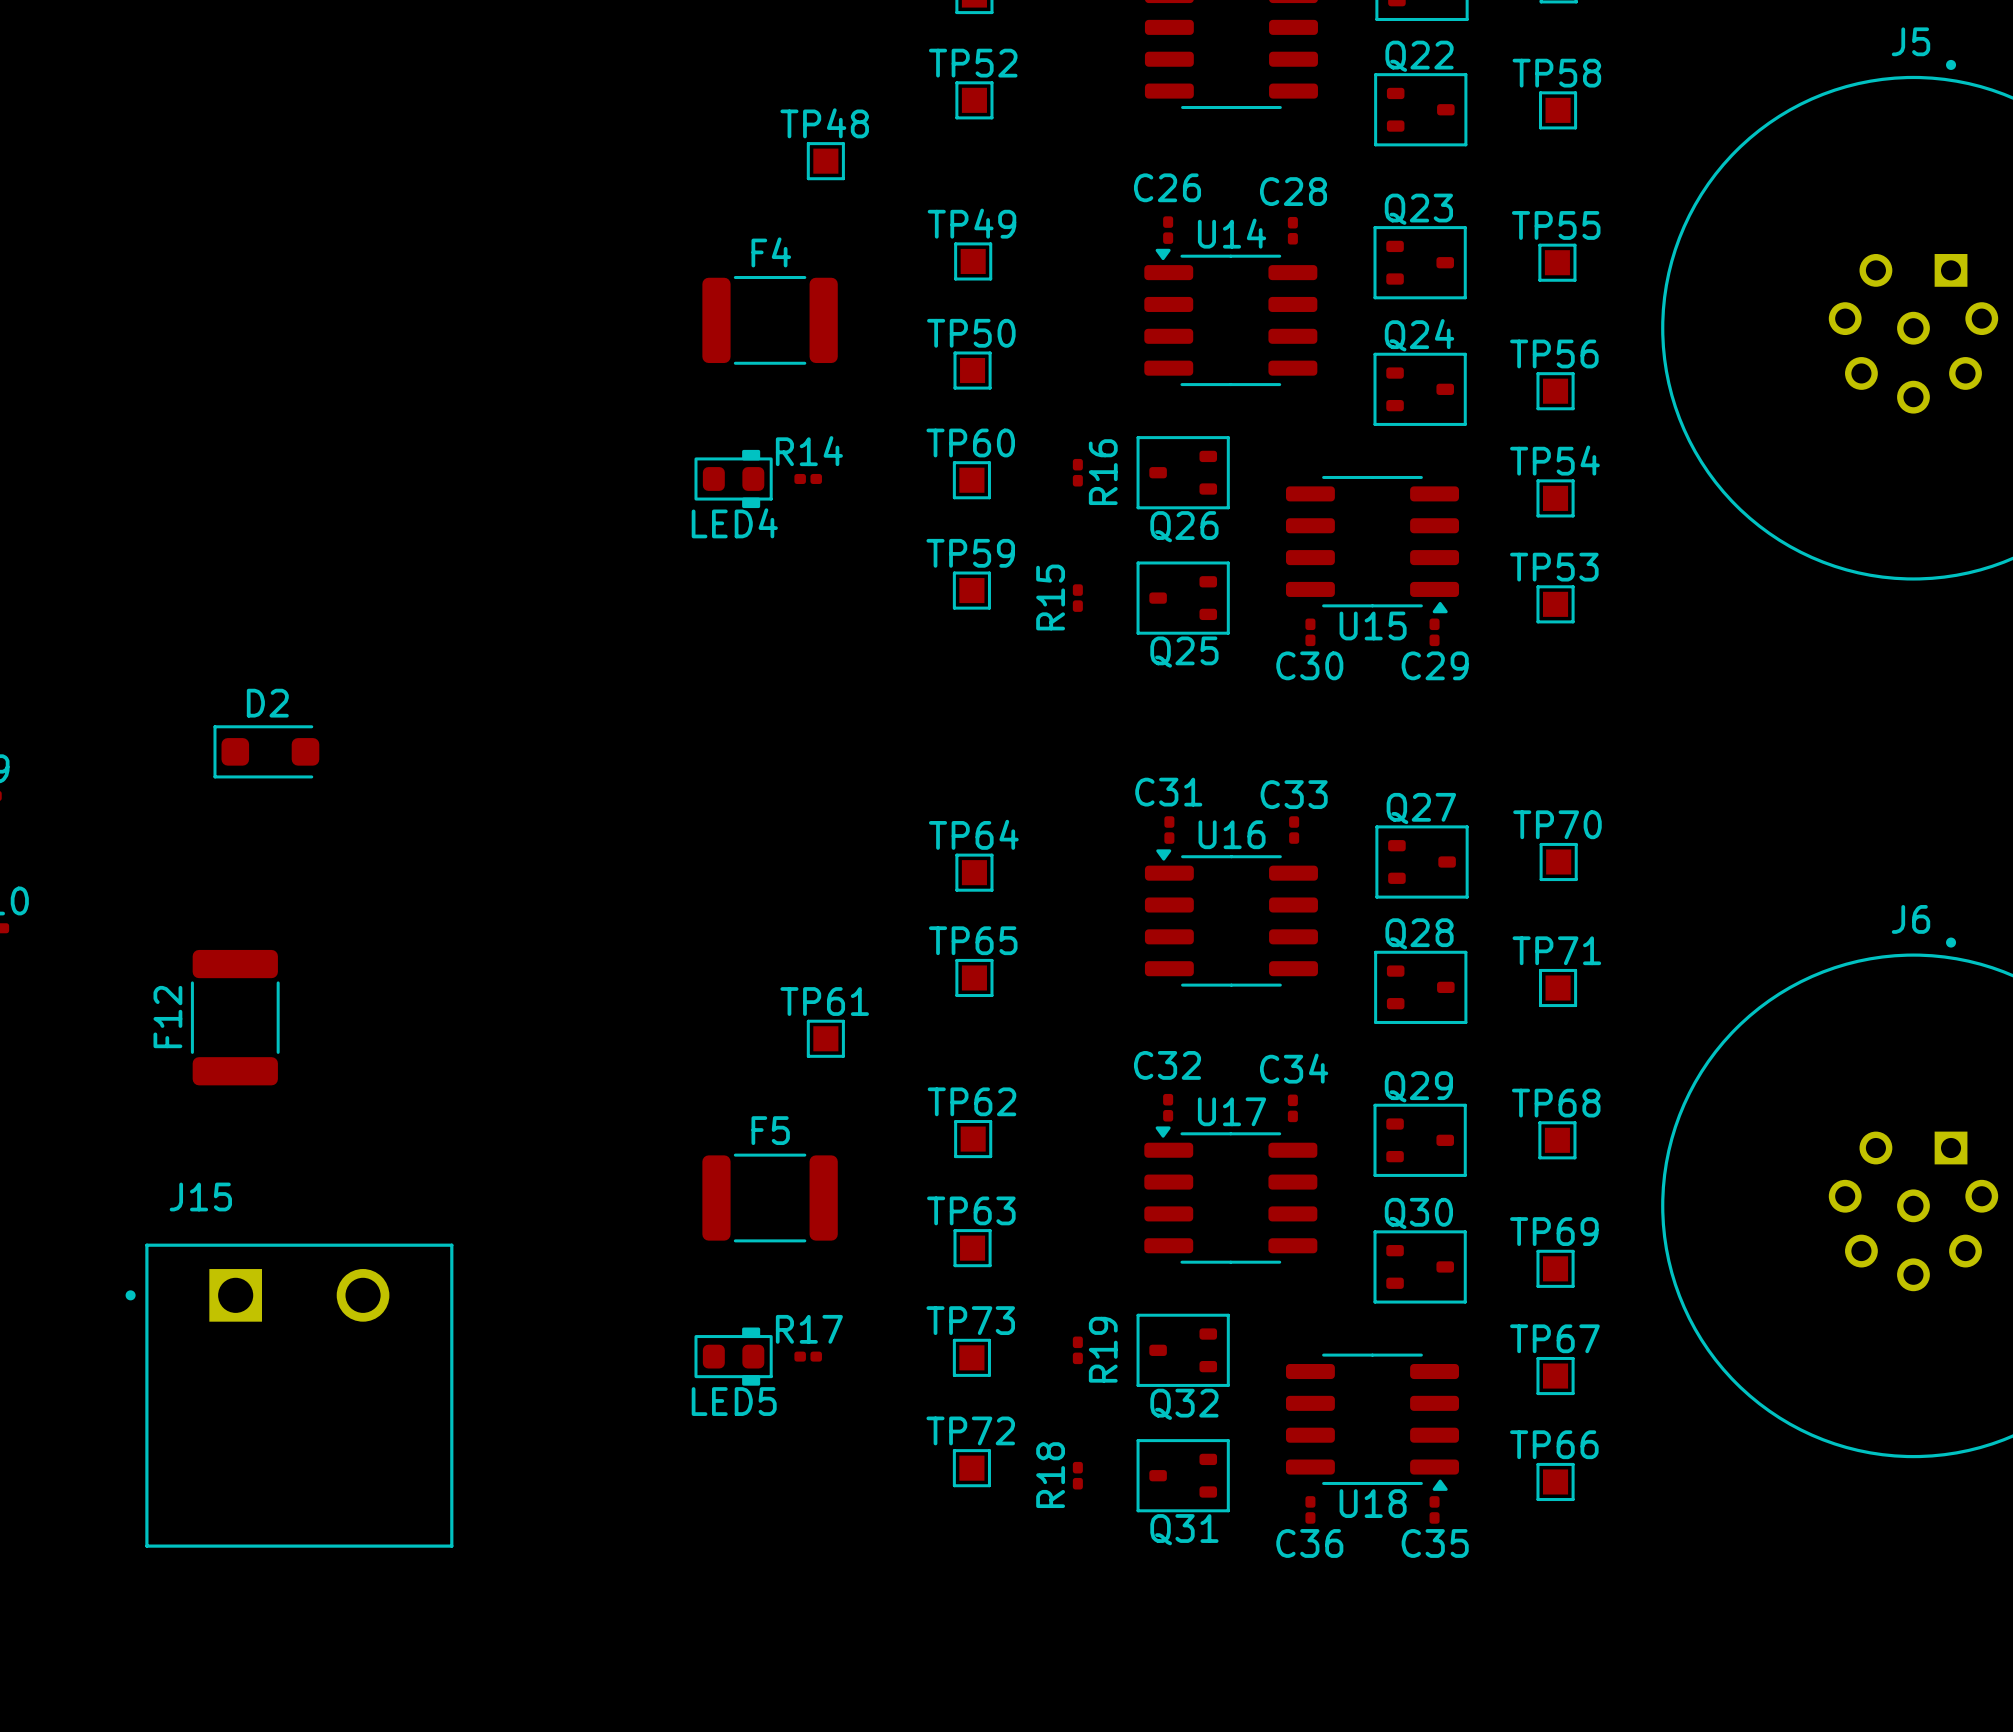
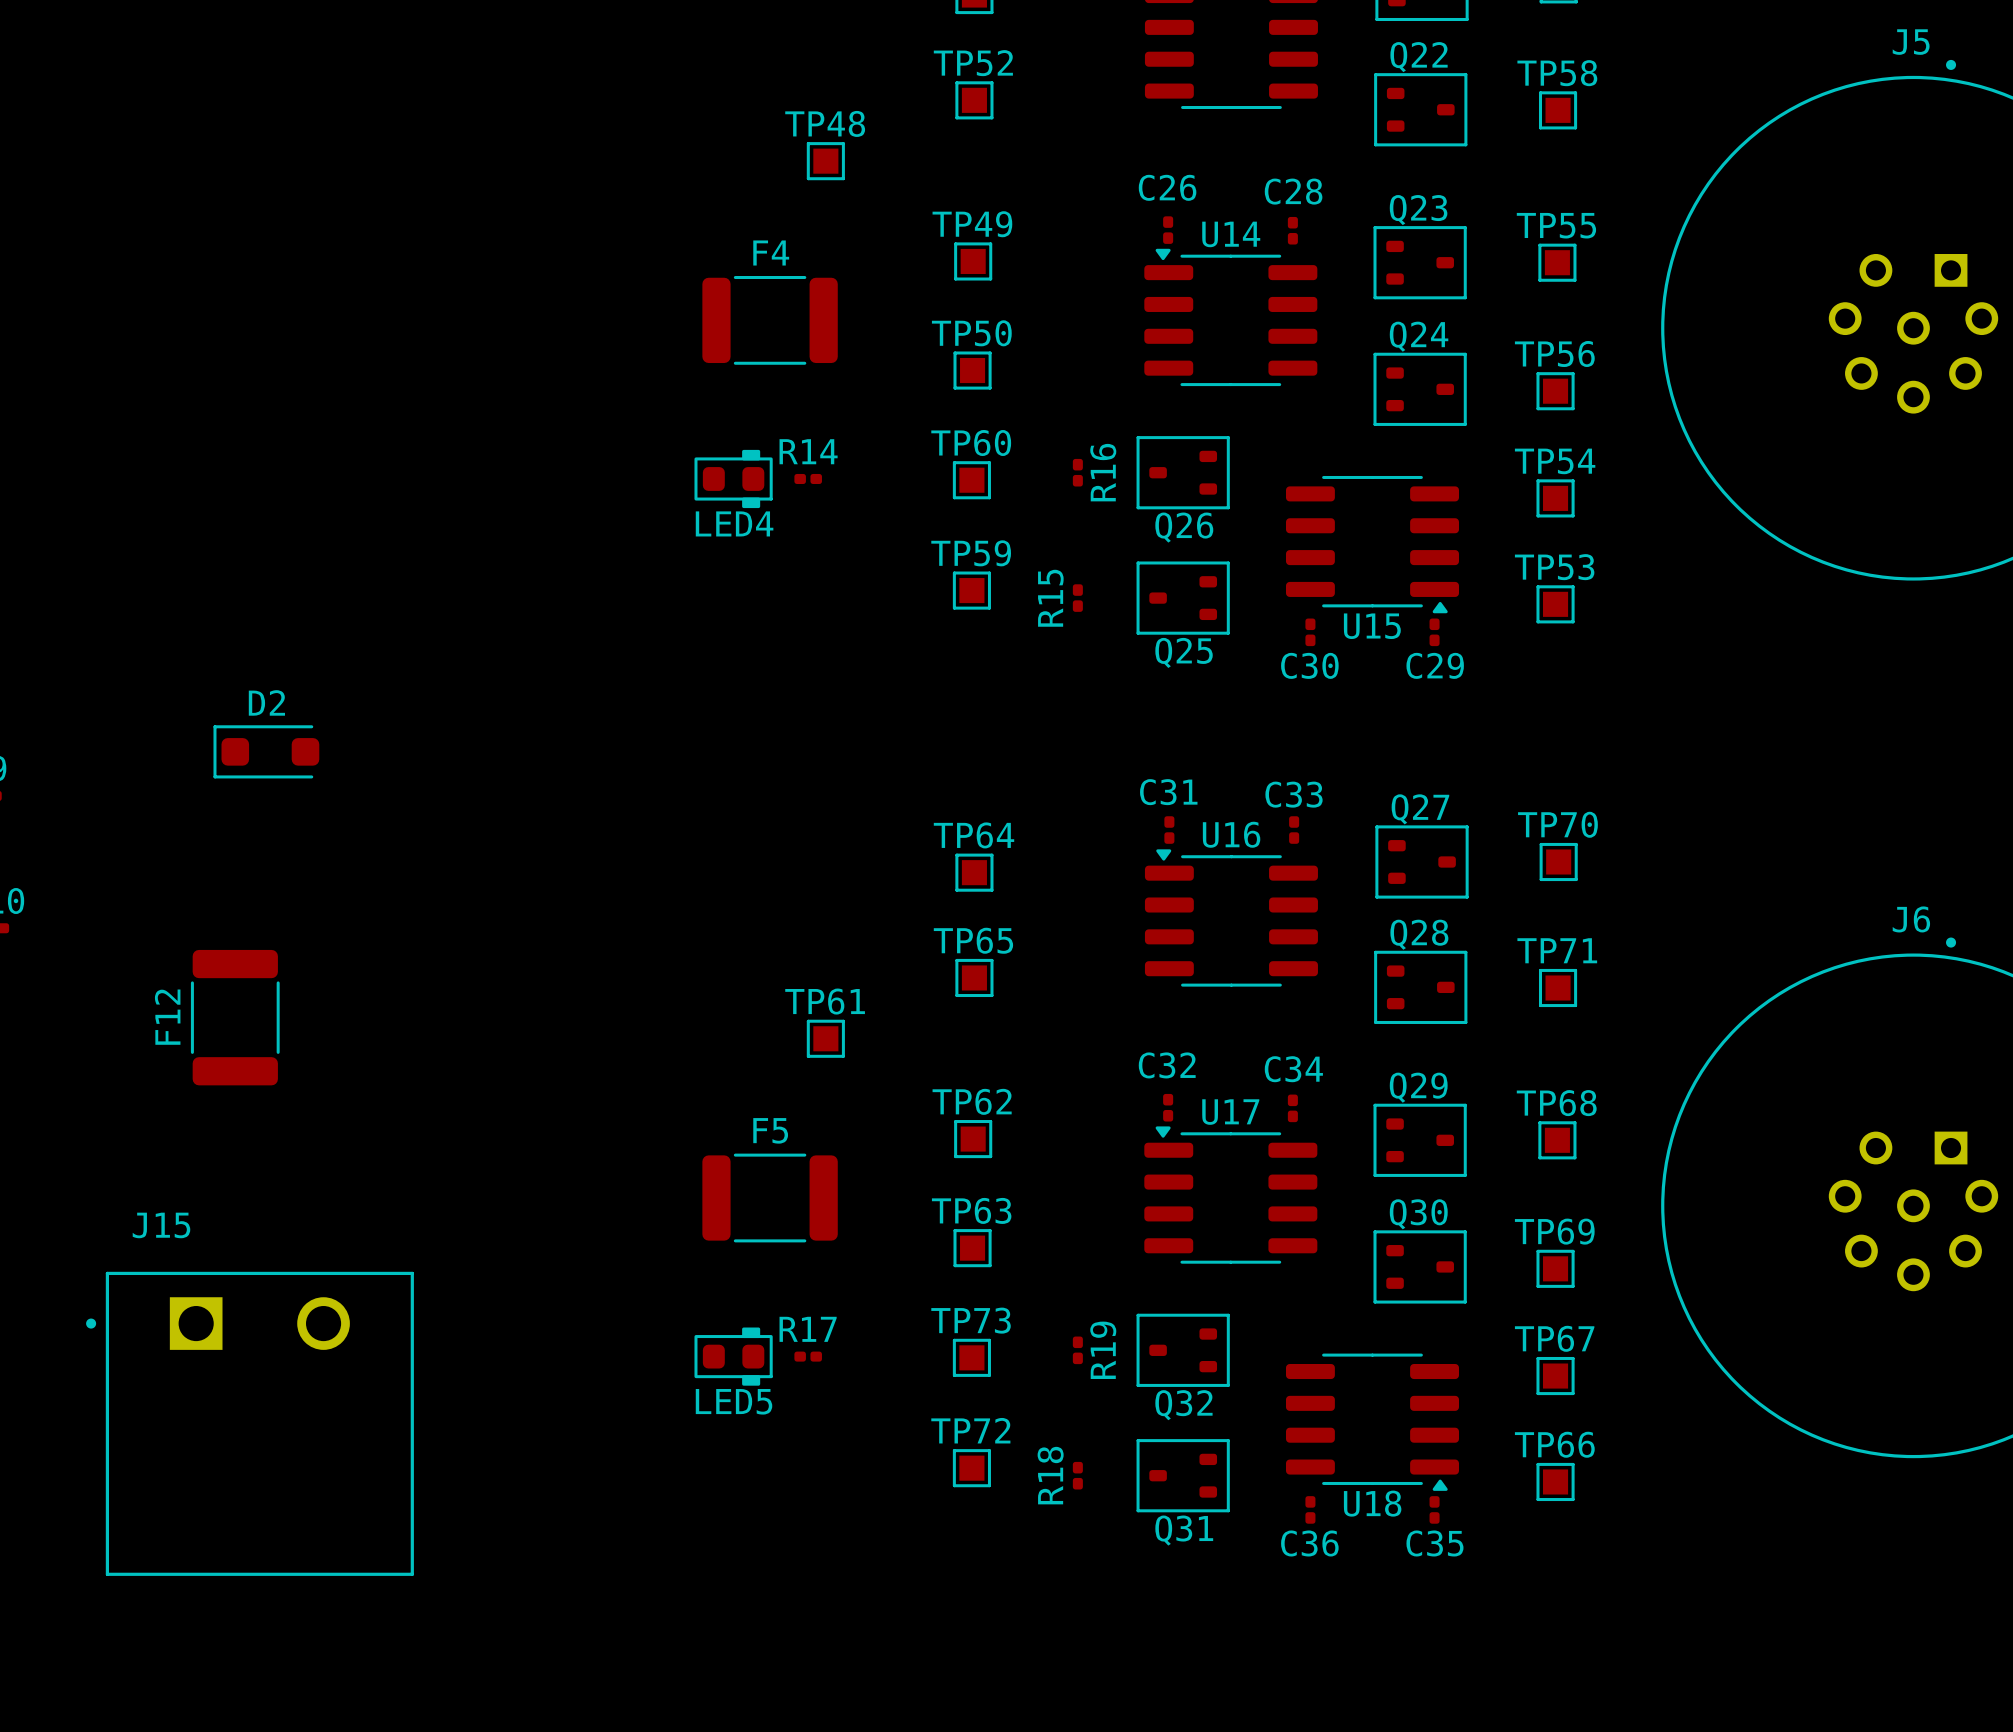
J15 position: (289, 1395) -> (250, 1423)

